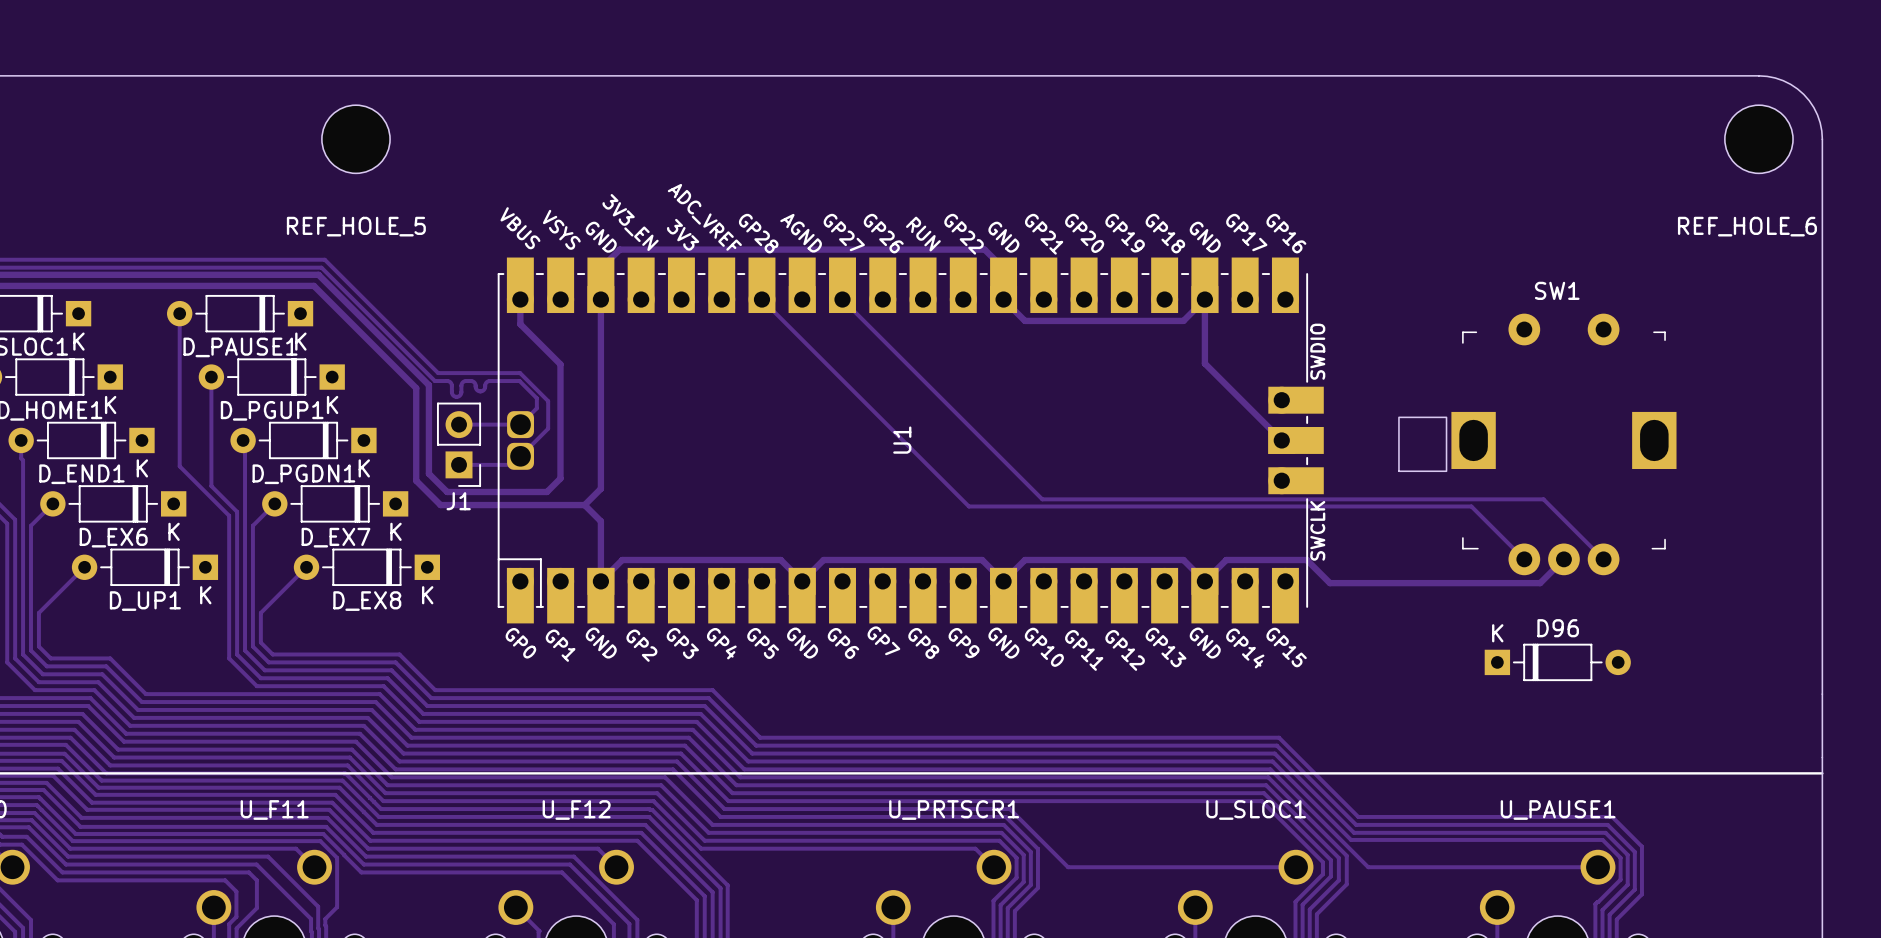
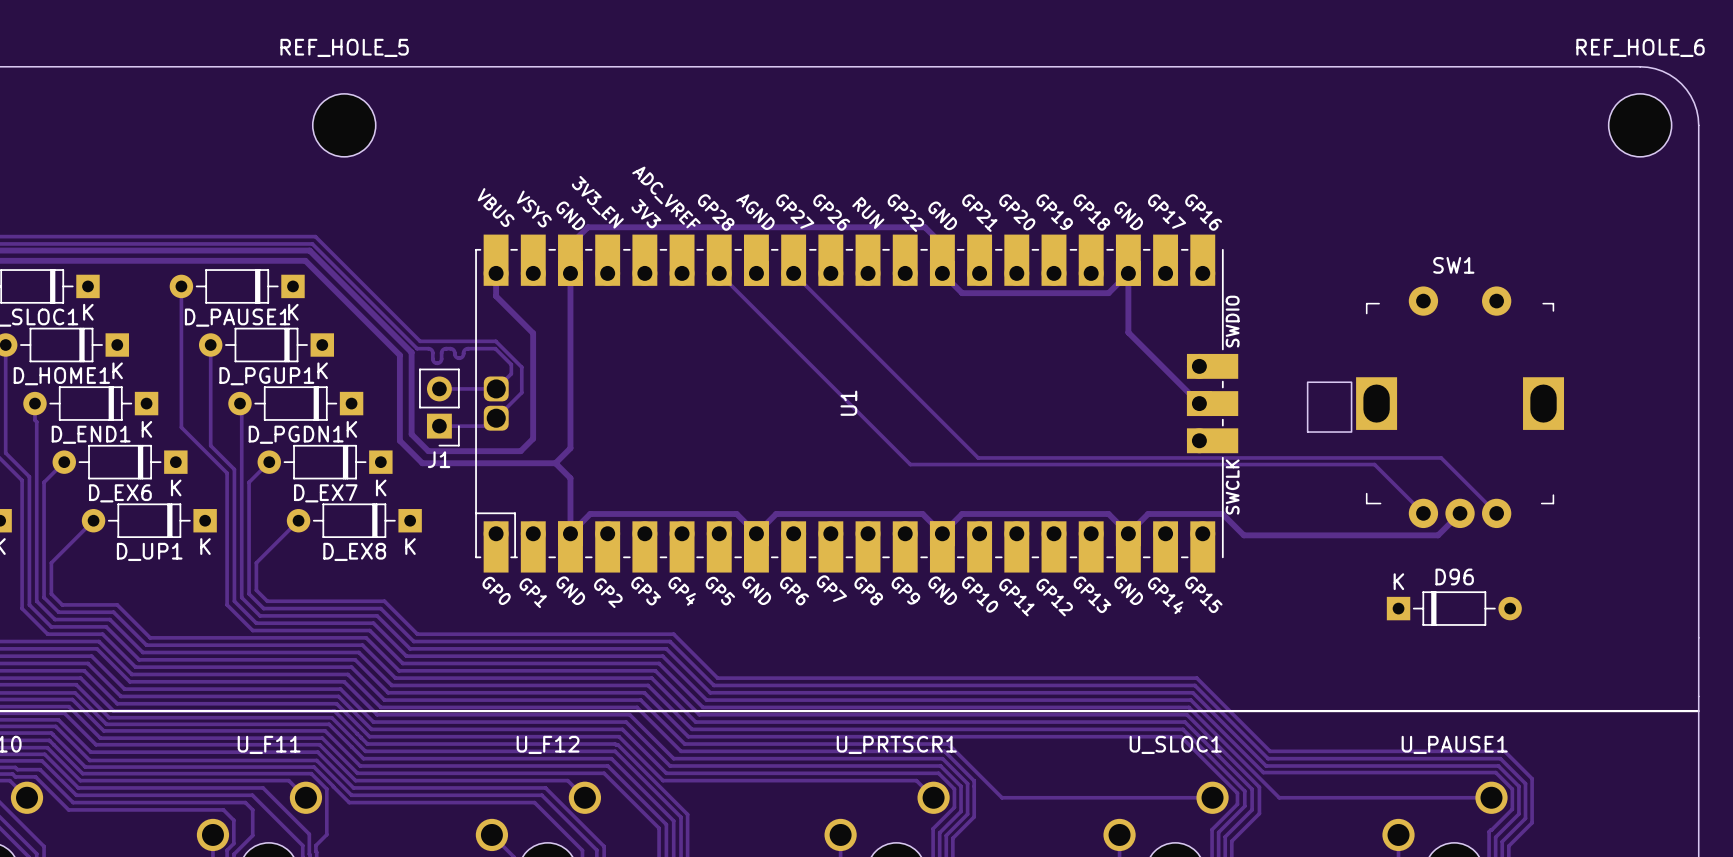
REF_HOLE_5 name position: REF_HOLE_5 (356, 226) -> REF_HOLE_5 (344, 47)
REF_HOLE_6 name position: REF_HOLE_6 (1747, 226) -> REF_HOLE_6 (1640, 47)

